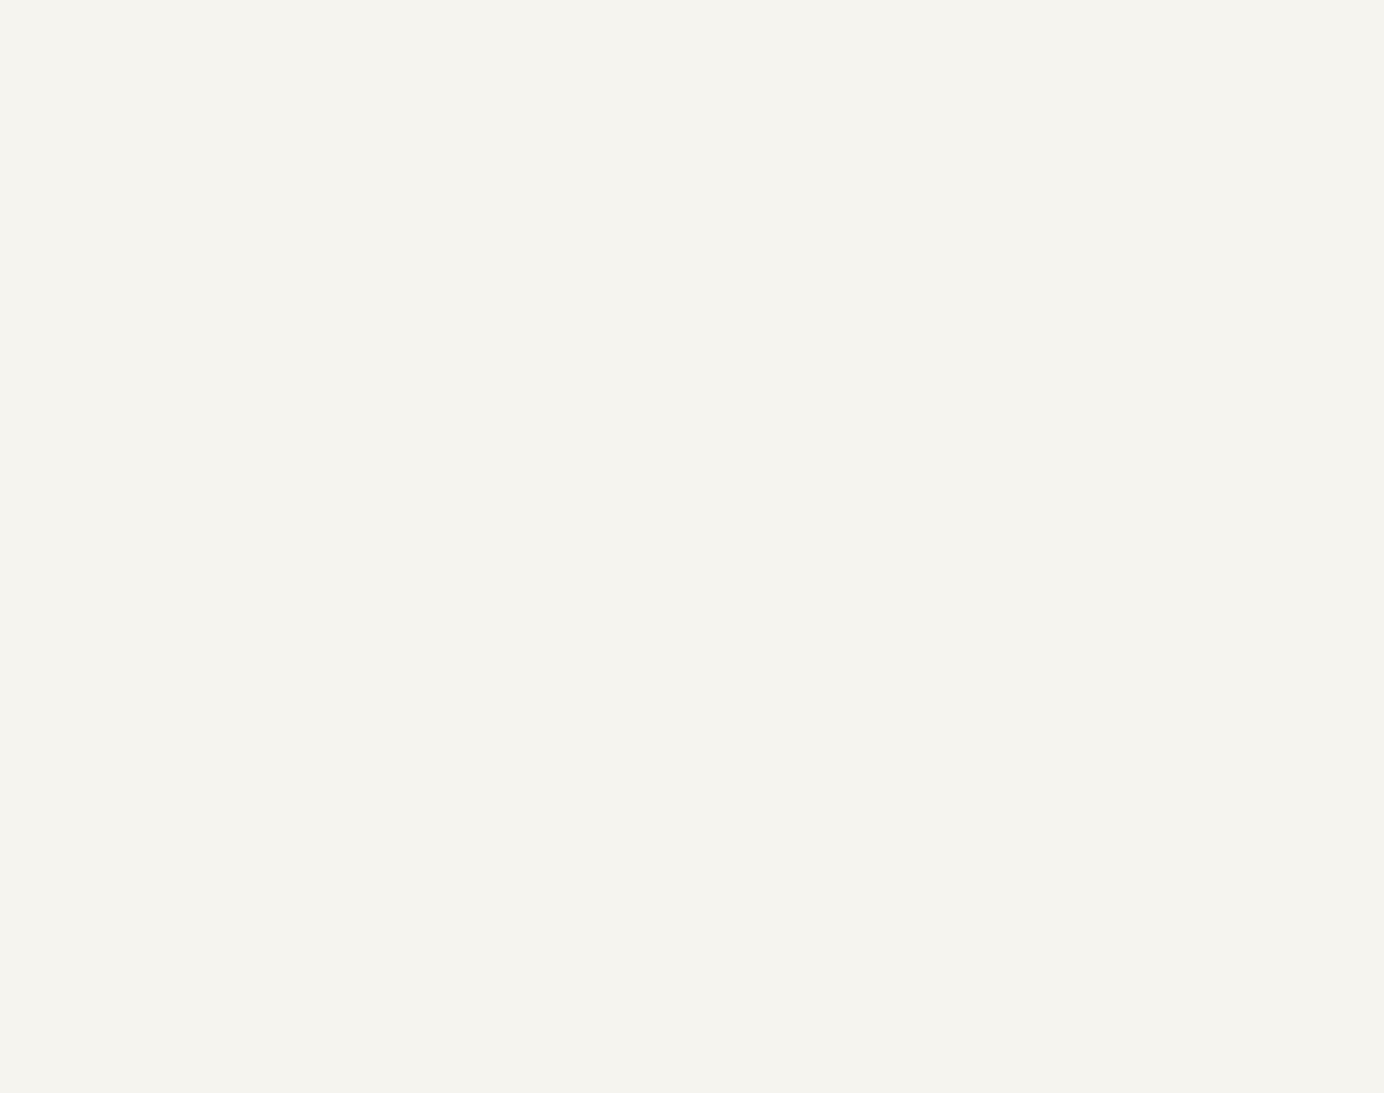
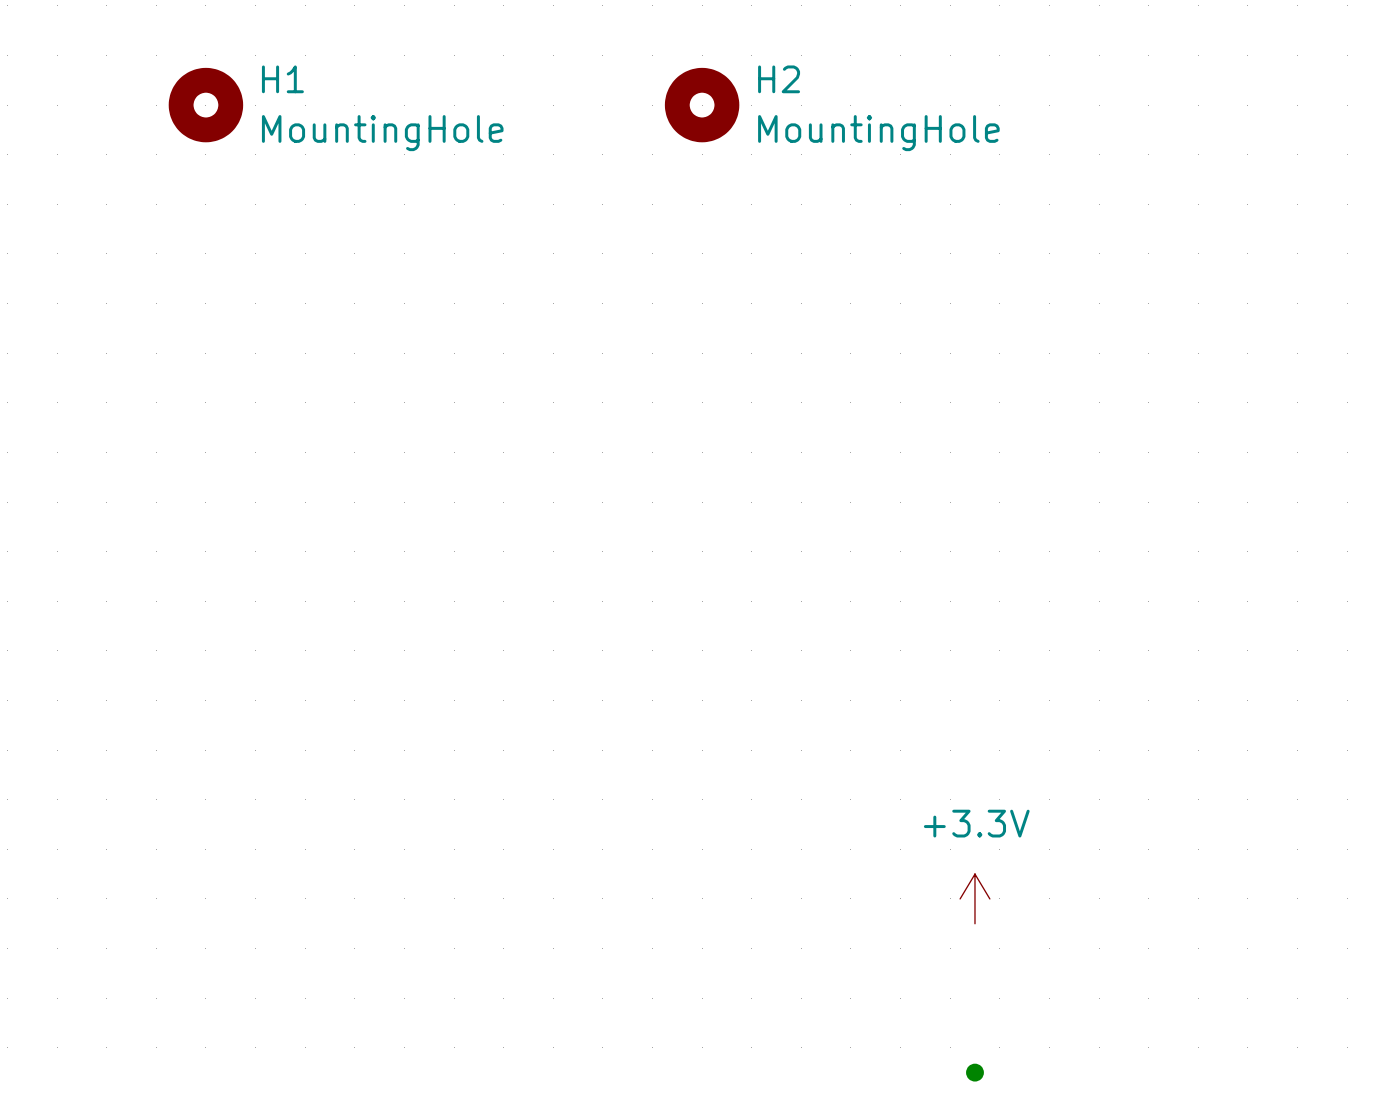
H1: none -> MountingHole (205, 105)
H2: none -> MountingHole (702, 105)
power symbol: none -> +3.3V (974, 898)
junction: none -> (974, 1072)

